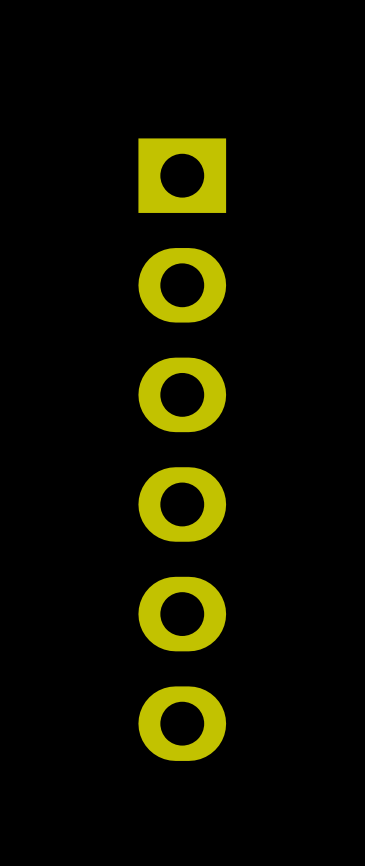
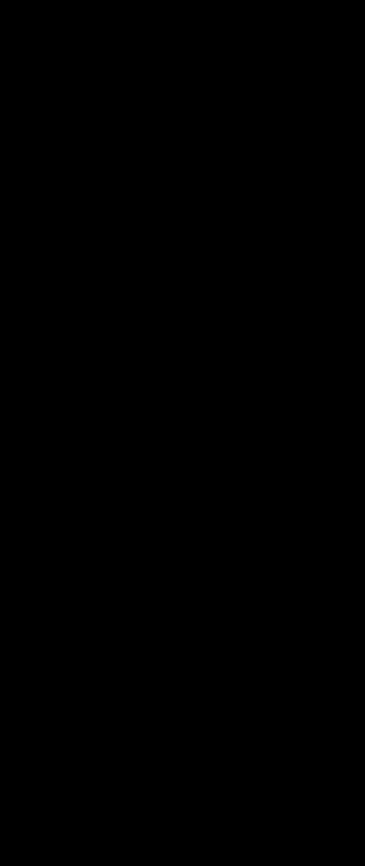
part: (182, 449) -> none

